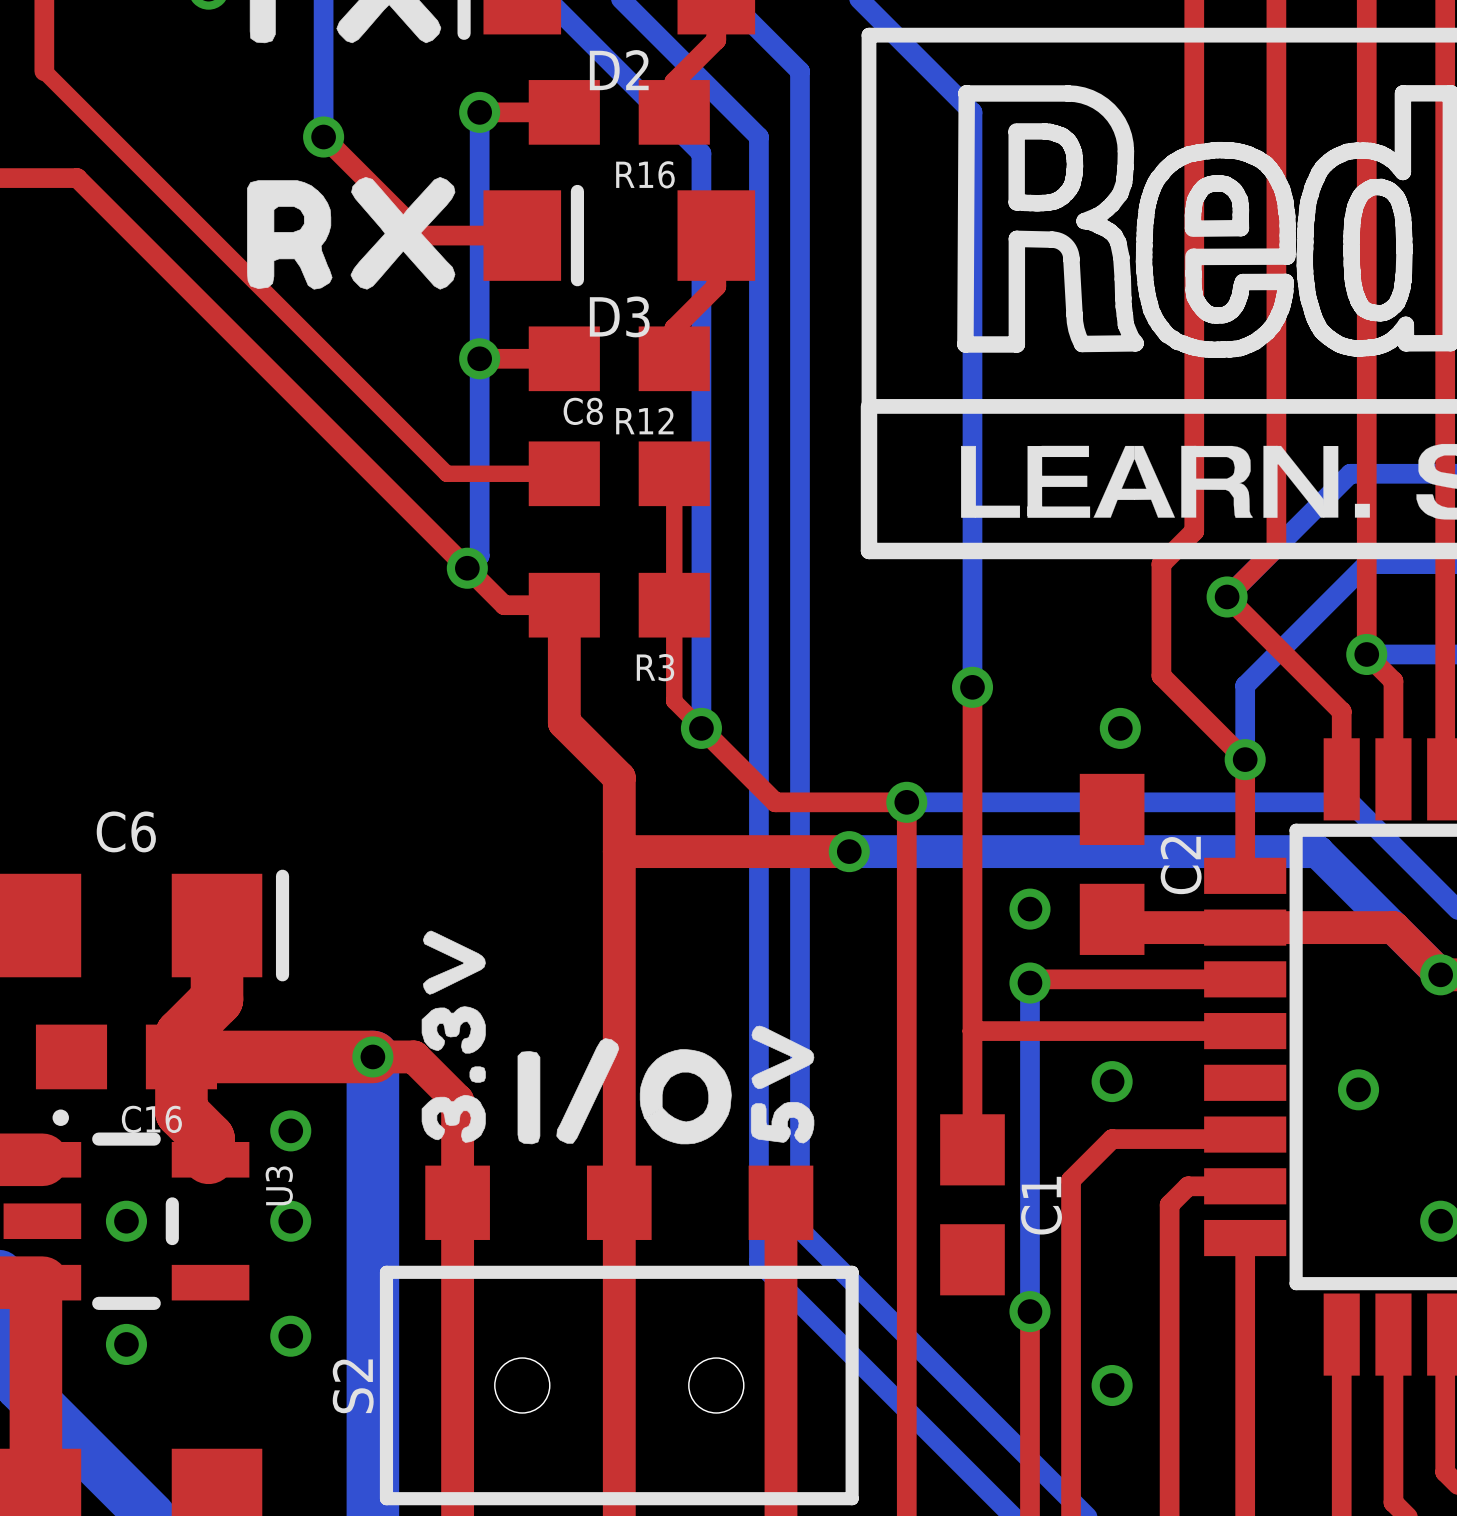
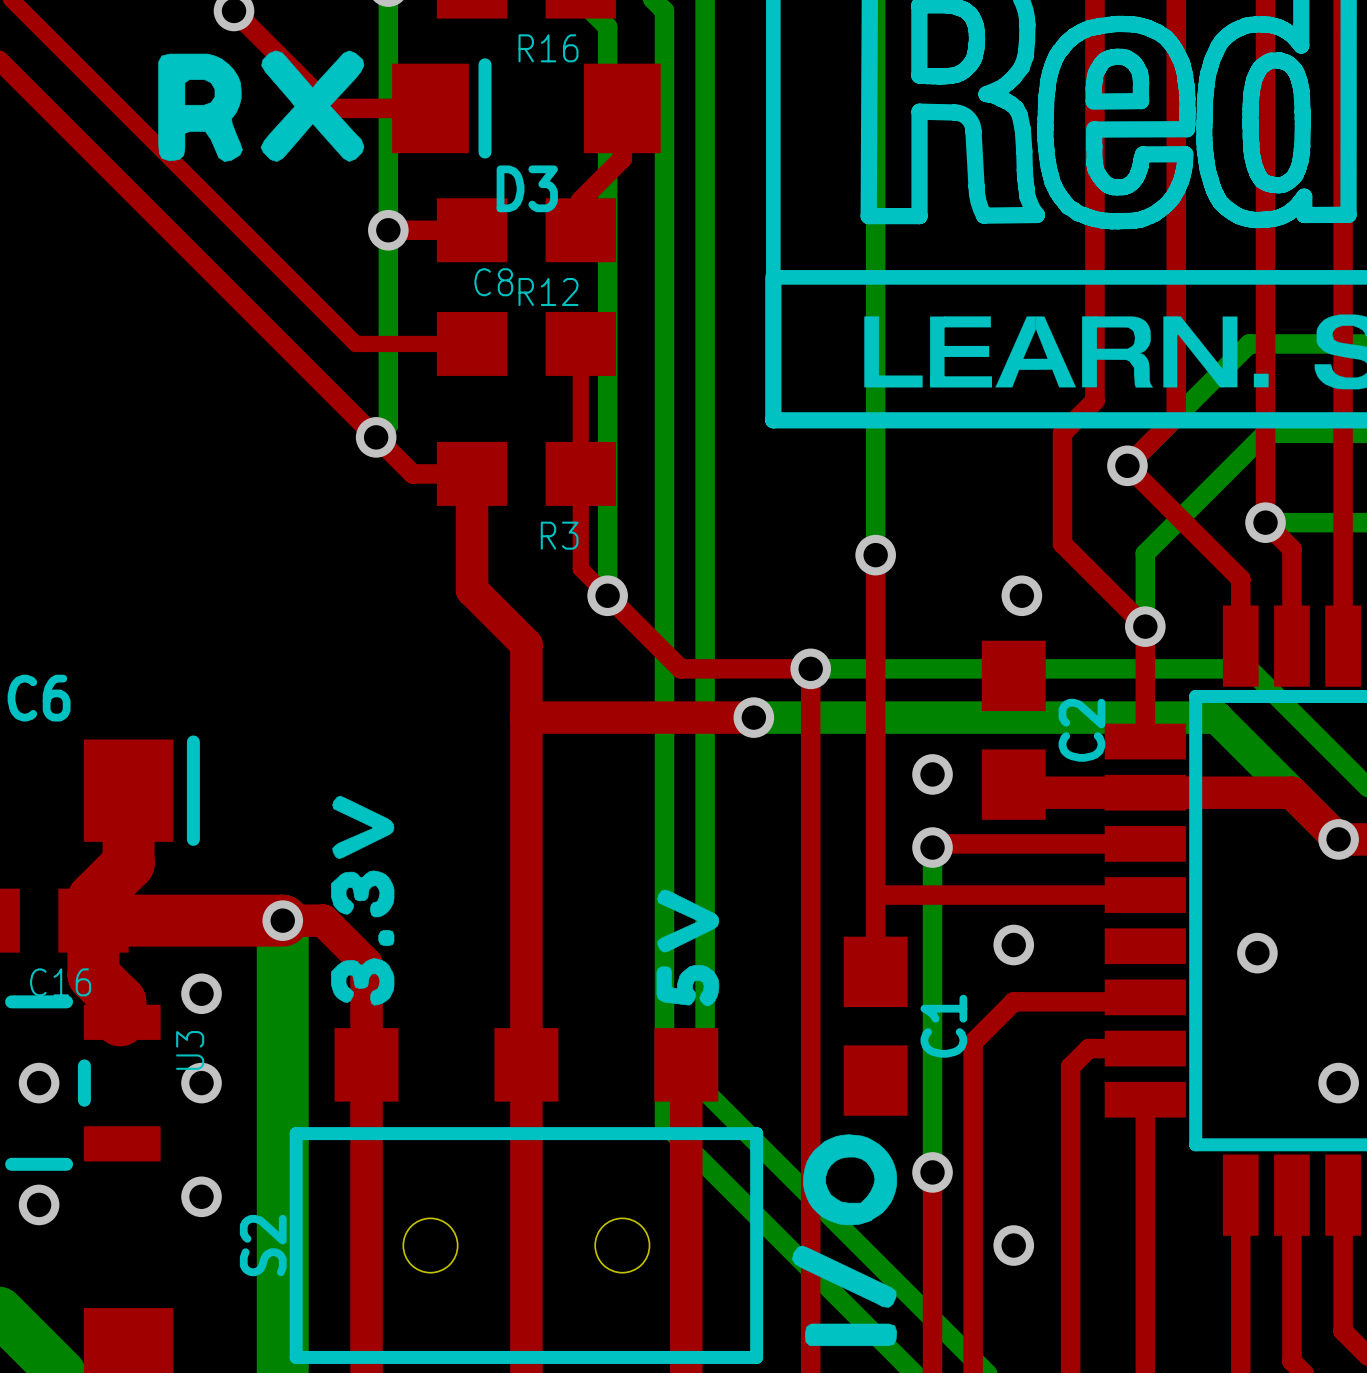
drawing: [517, 1038, 732, 1145] -> none
C1 position: (972, 1204) -> (875, 1026)
drawing: none -> [792, 1134, 898, 1347]

